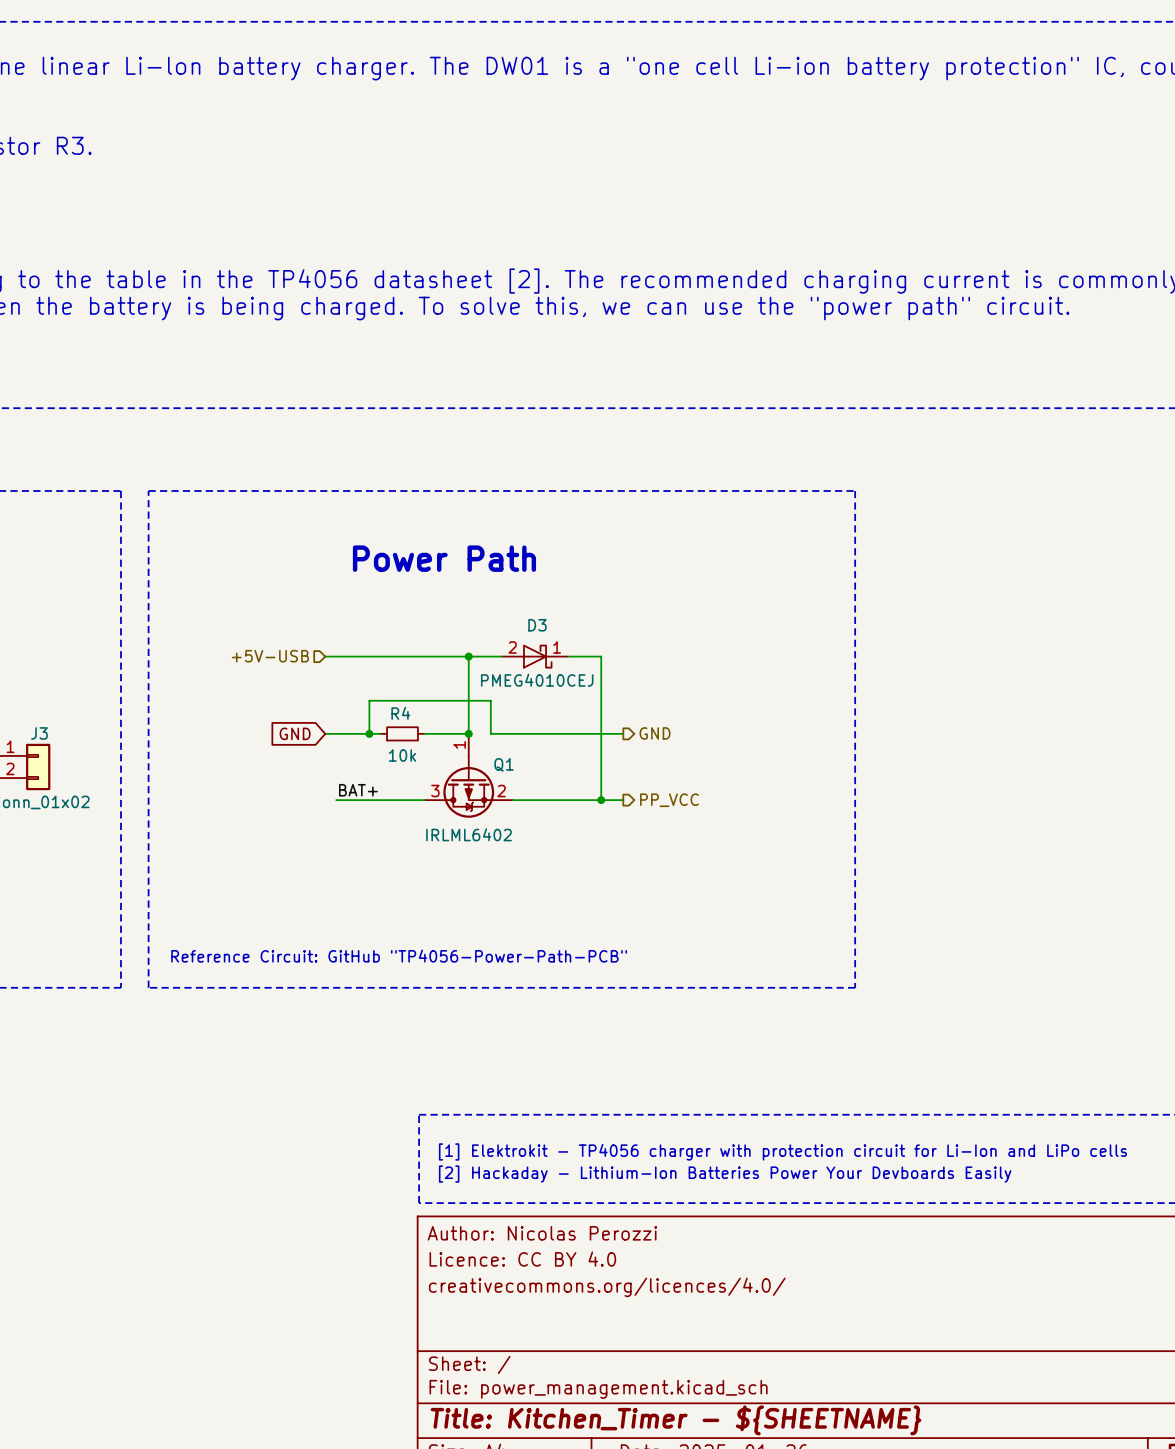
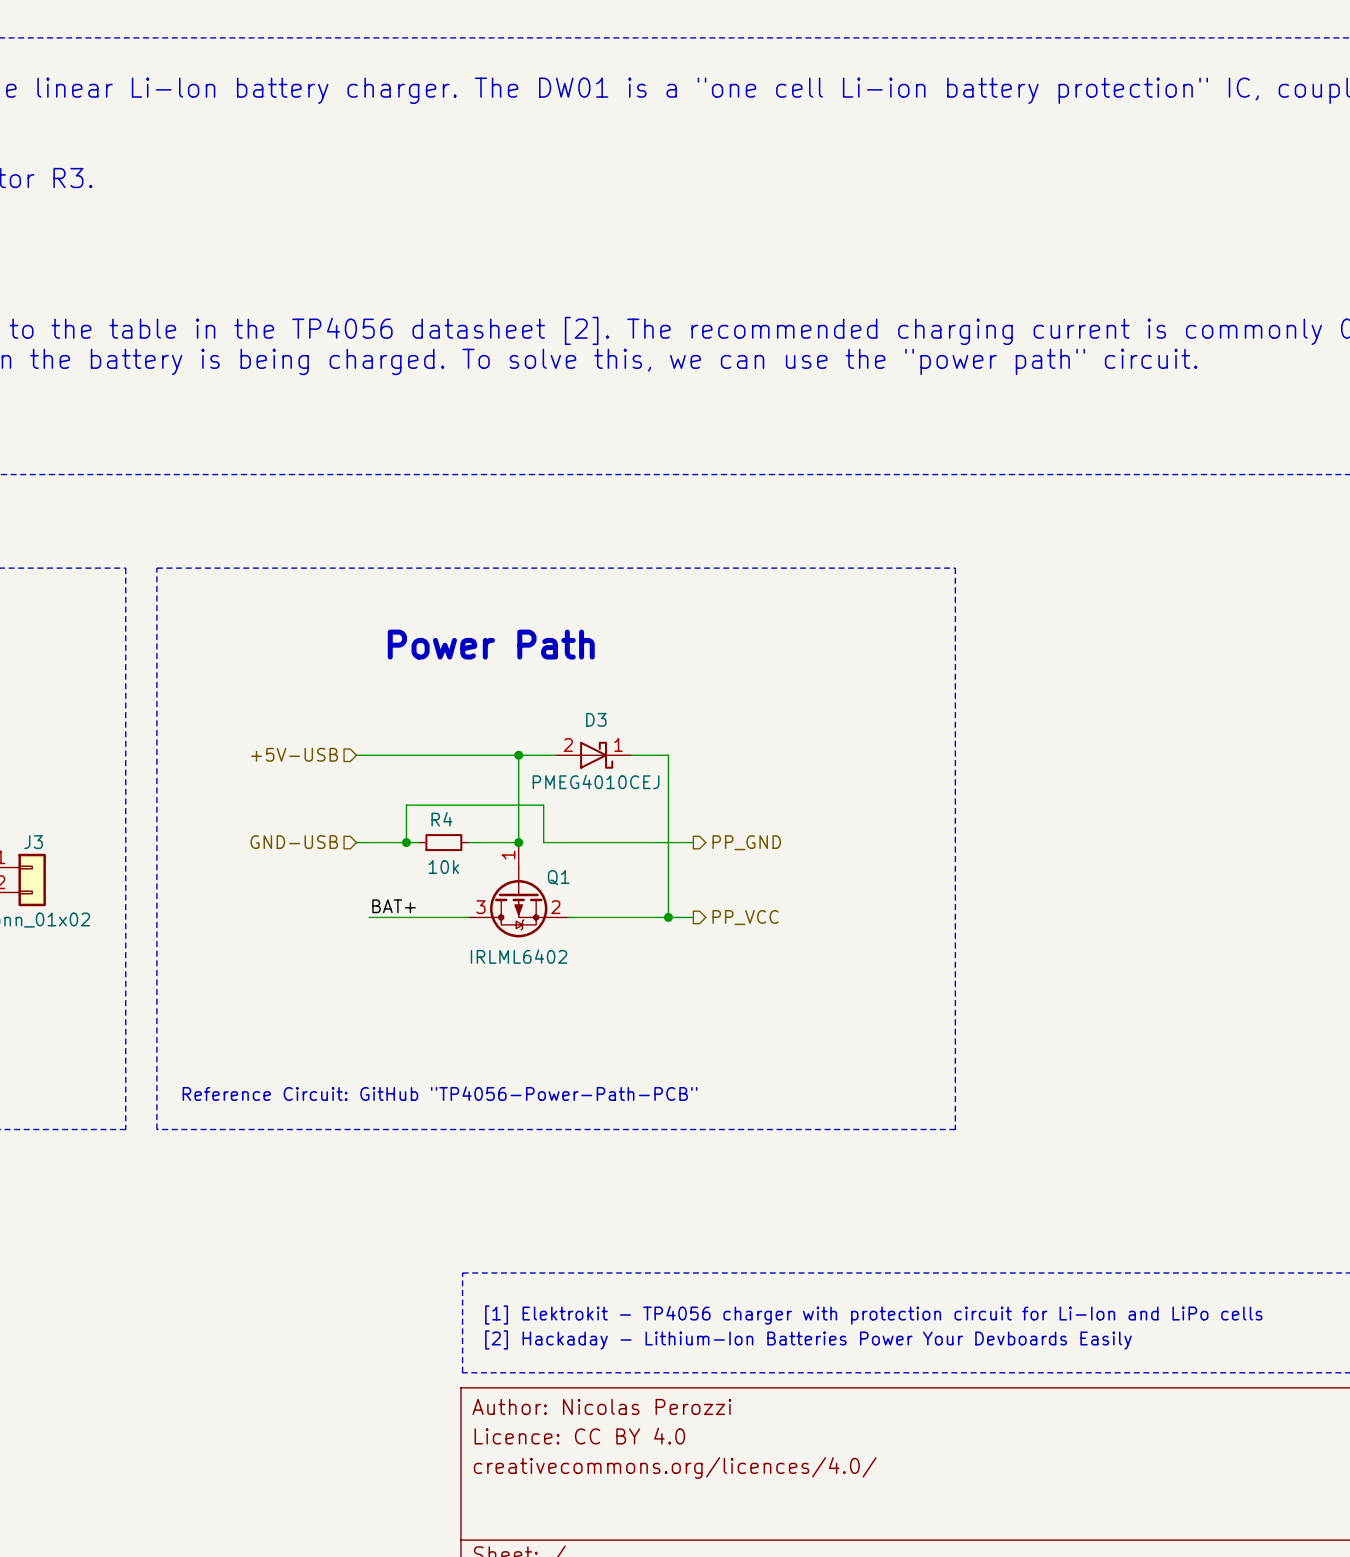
hierarchical label: none -> GND-USB (294, 842)
global label: GND (295, 733) -> none
hierarchical label: GND (655, 733) -> PP_GND (746, 842)

